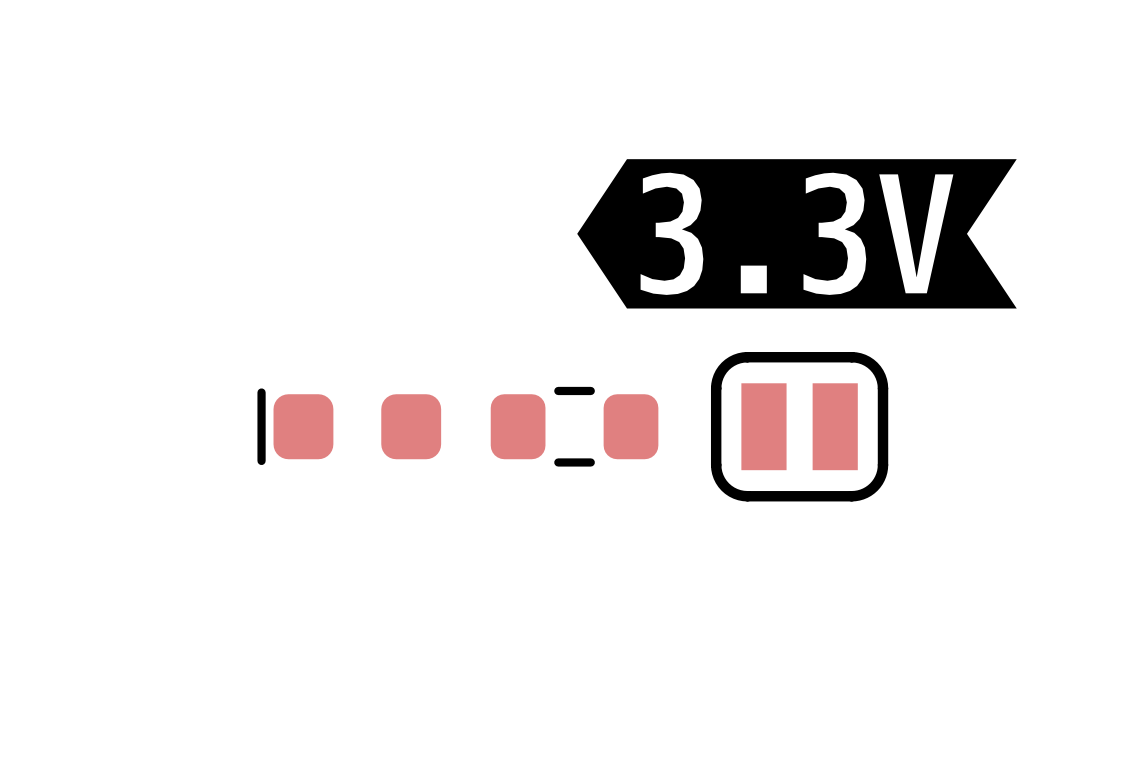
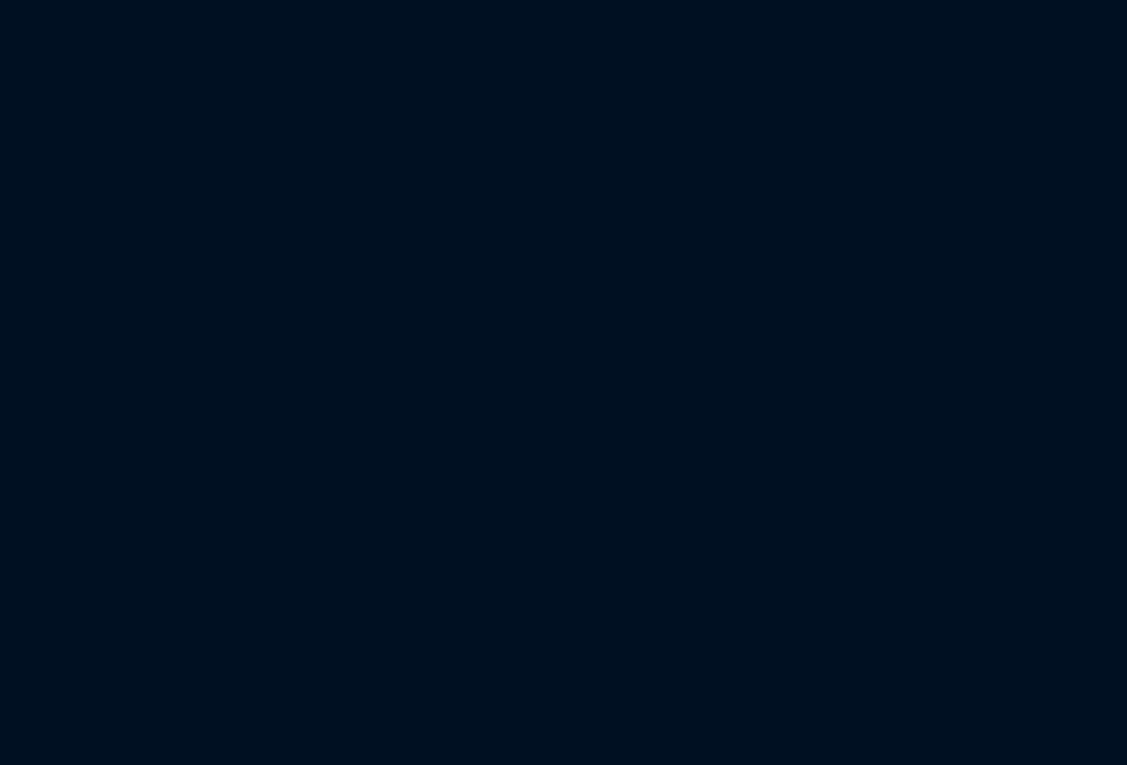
drawing: [577, 159, 1017, 309] -> none
part: (349, 426) -> none
part: (574, 426) -> none
part: (799, 426) -> none

